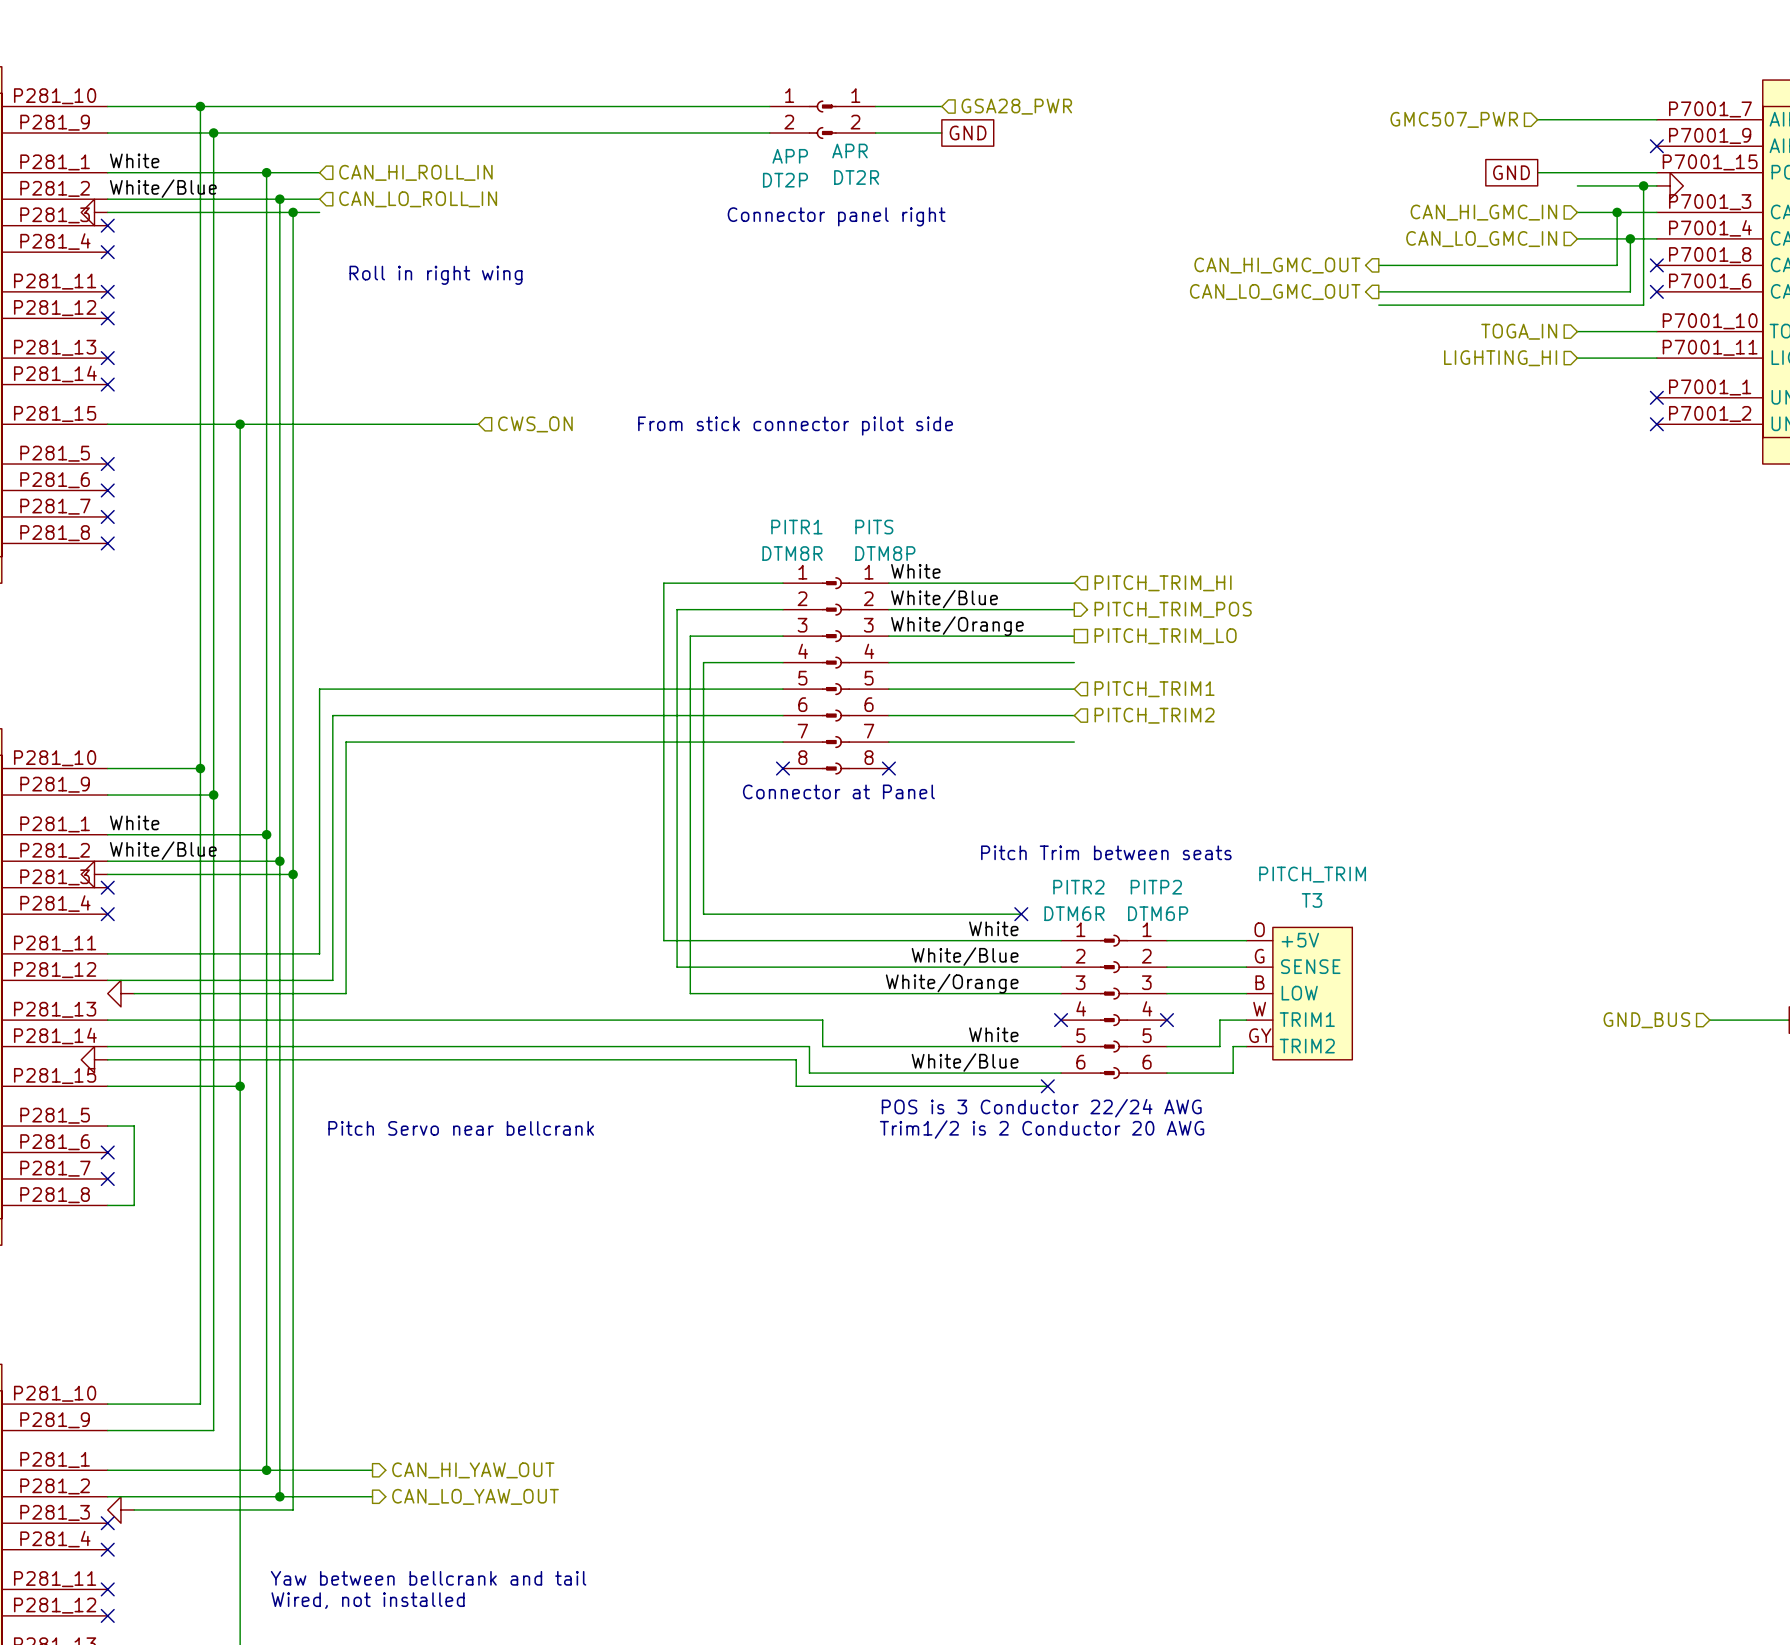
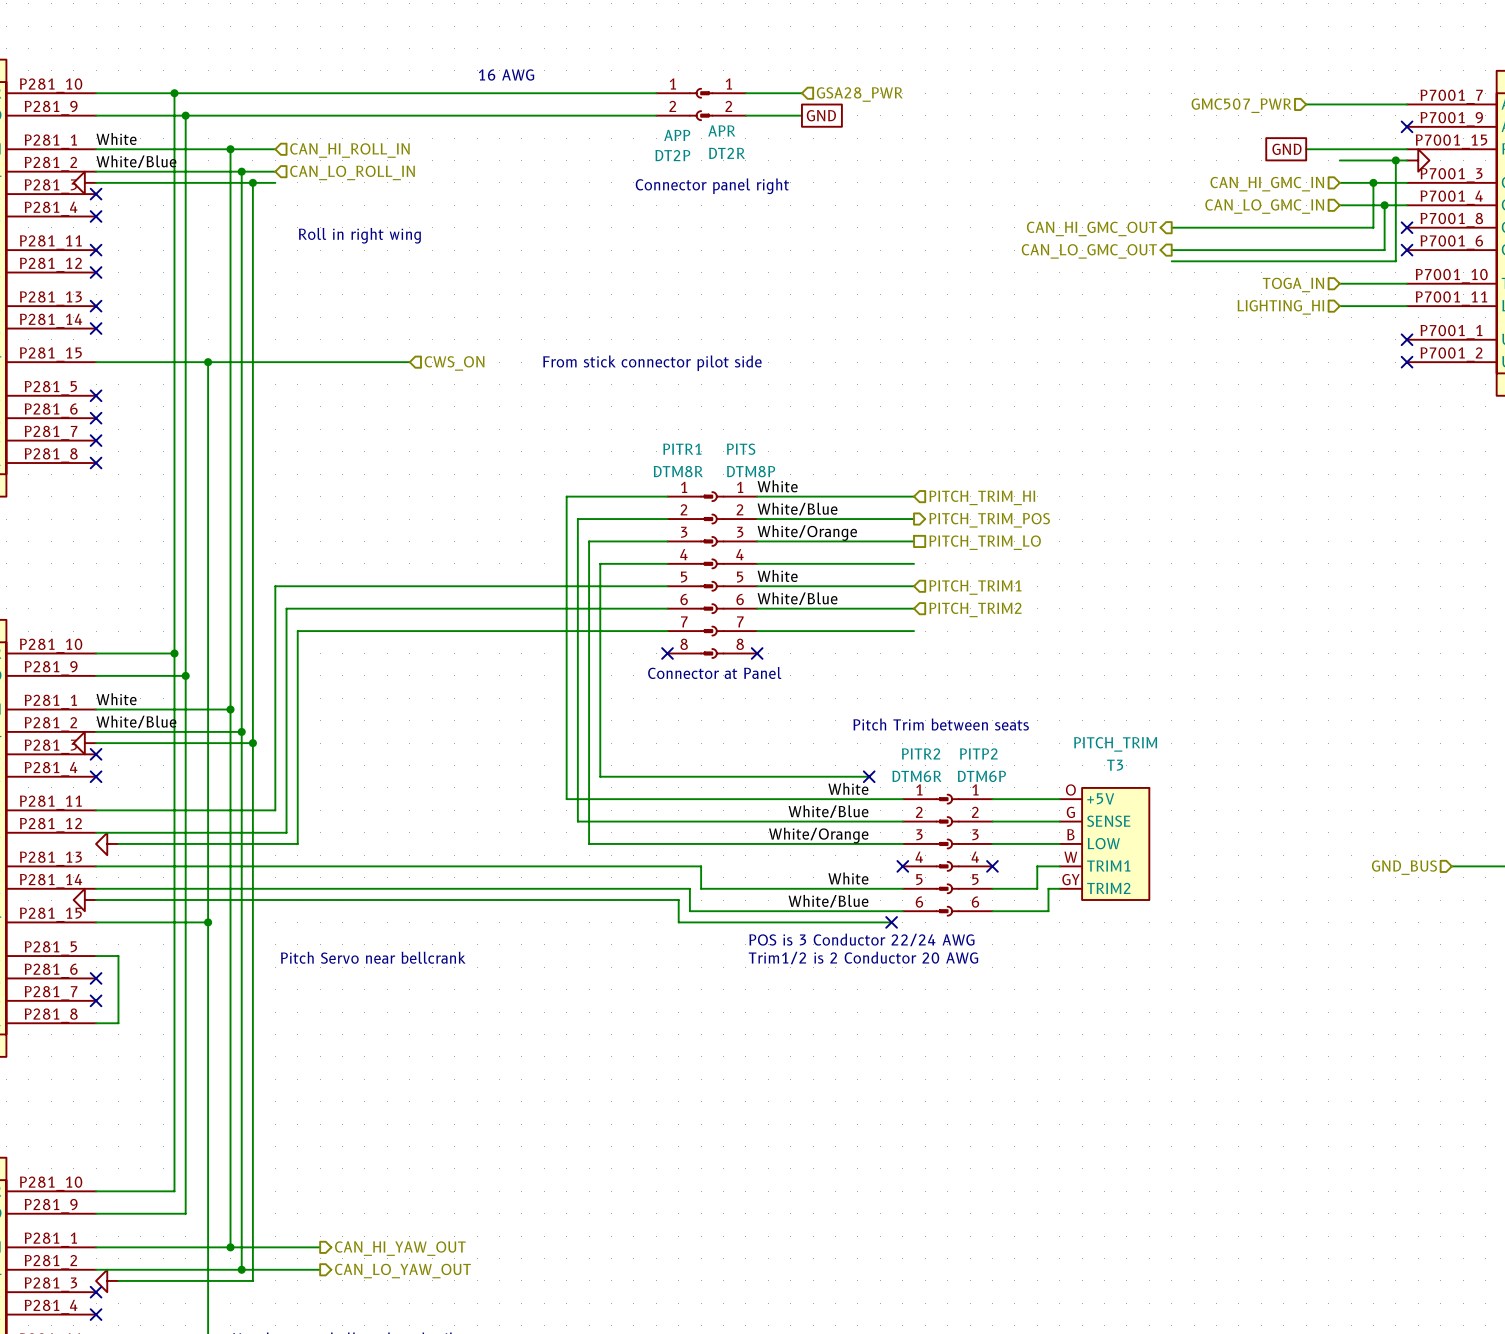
text: none -> 16 AWG (506, 74)
label: none -> White (777, 575)
label: none -> White/Blue (797, 598)

